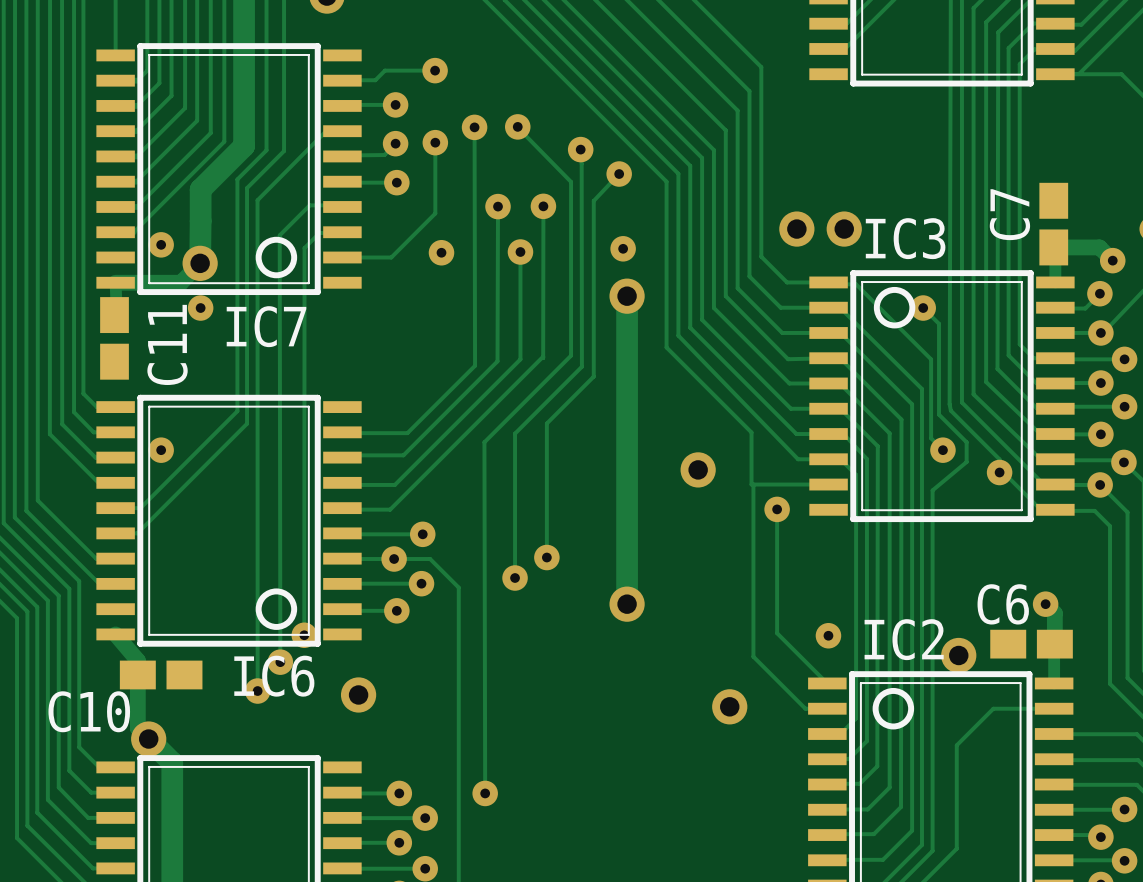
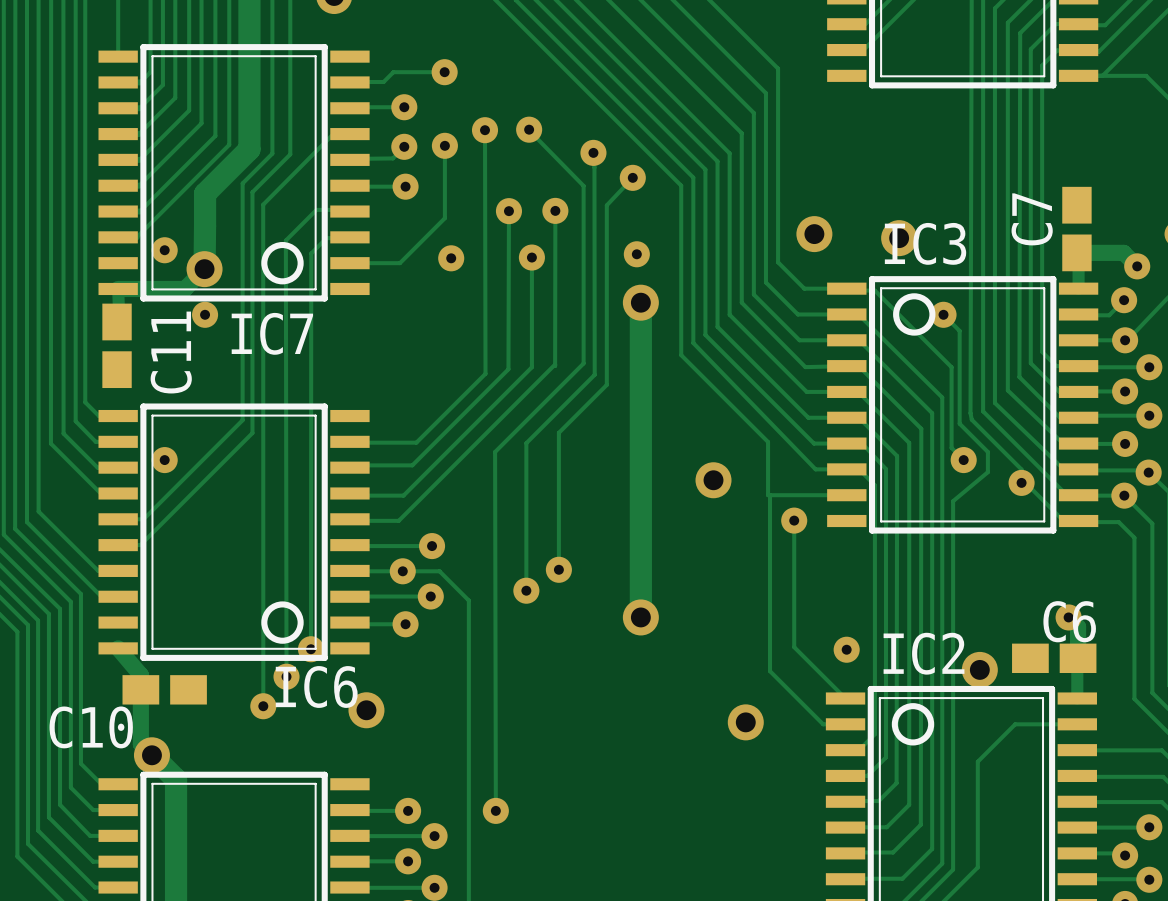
via position: (844, 229) -> (899, 238)
C6 name position: C6 (1003, 604) -> C6 (1069, 621)
IC6 name position: IC6 (274, 676) -> IC6 (316, 687)

